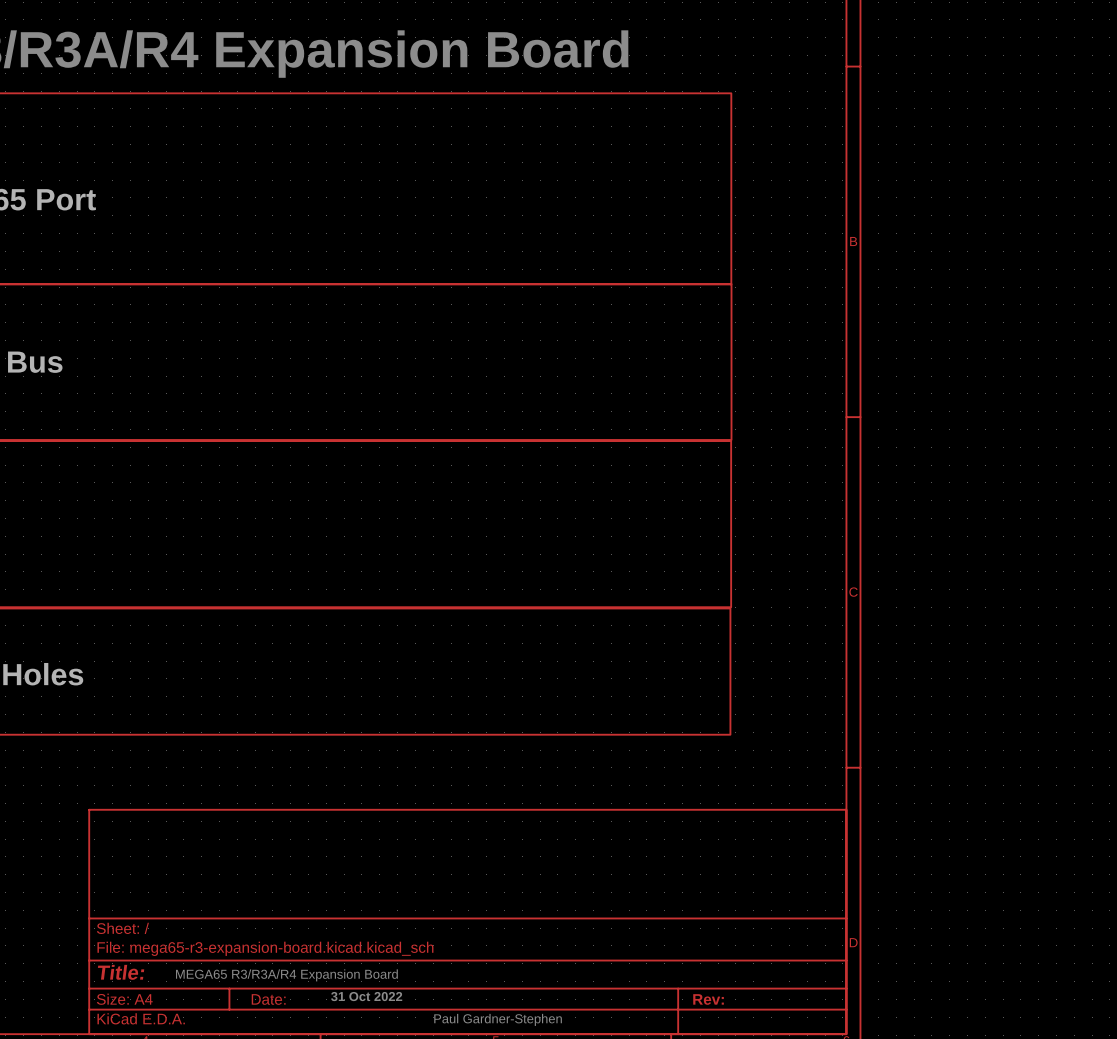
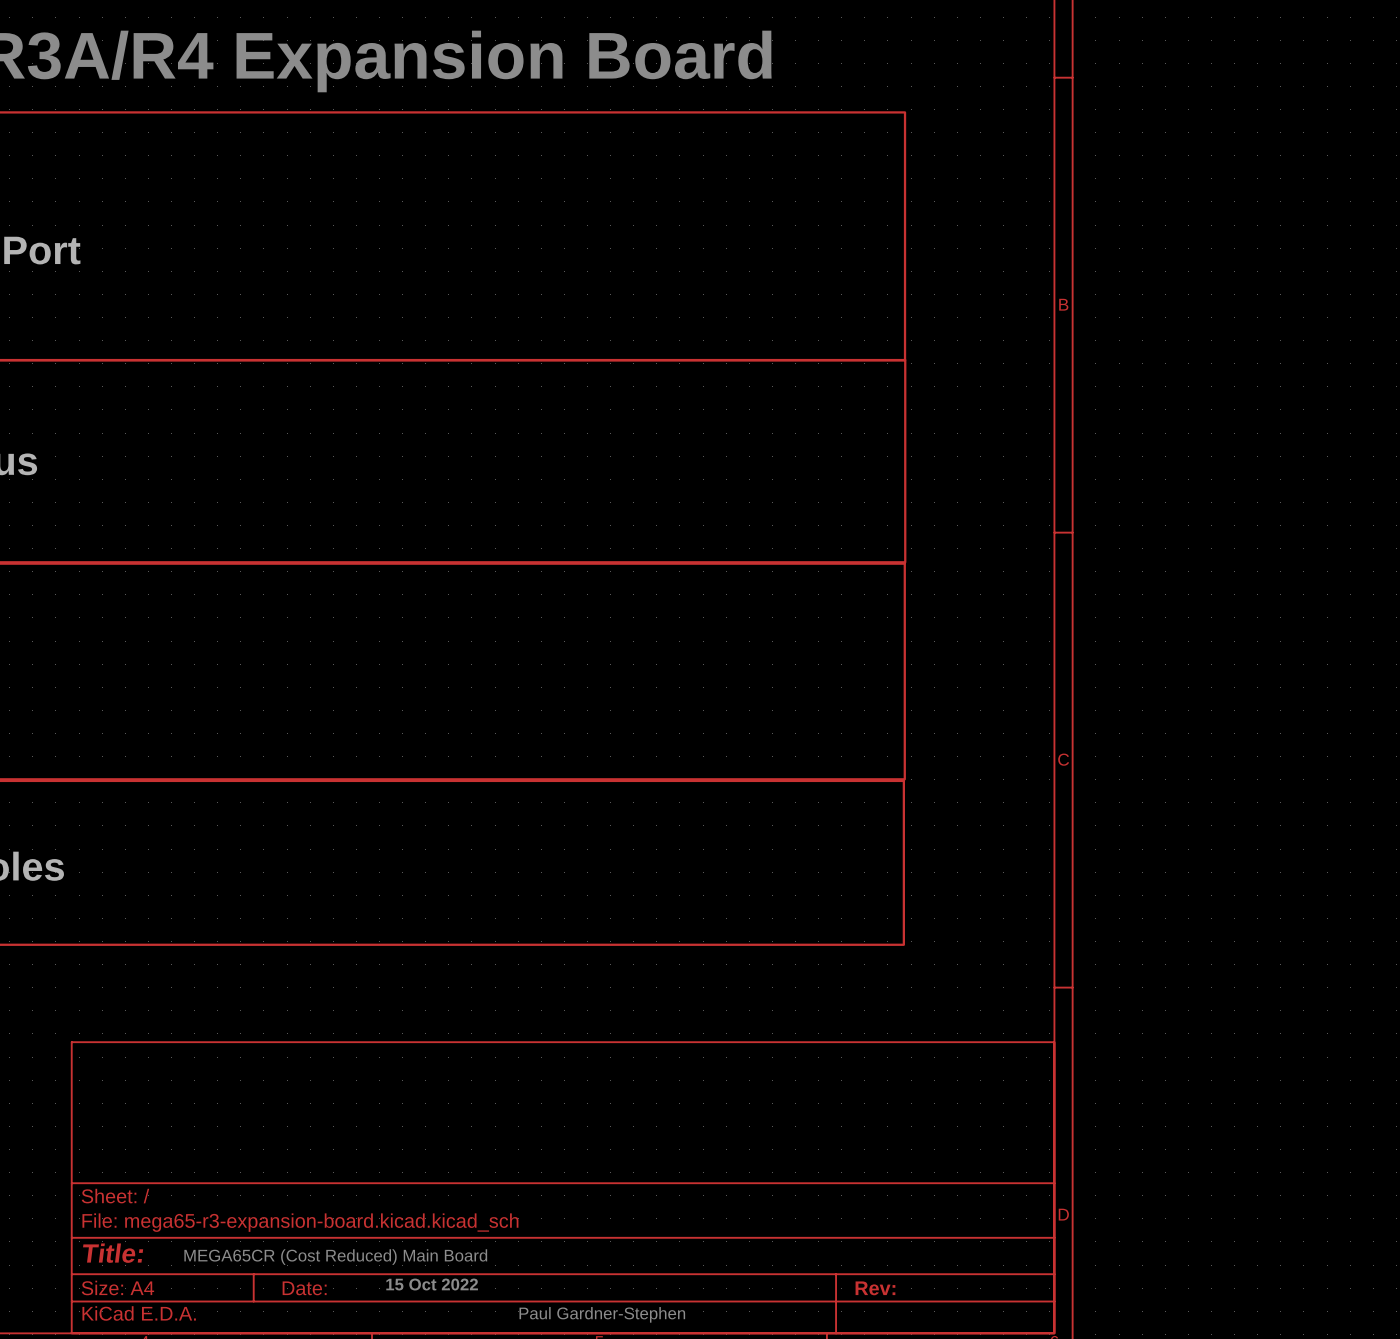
text: MEGA65 R3/R3A/R4 Expansion Board (286, 975) -> MEGA65CR (Cost Reduced) Main Board (335, 1257)
text: 31 Oct 2022 (366, 996) -> 15 Oct 2022 (432, 1284)

